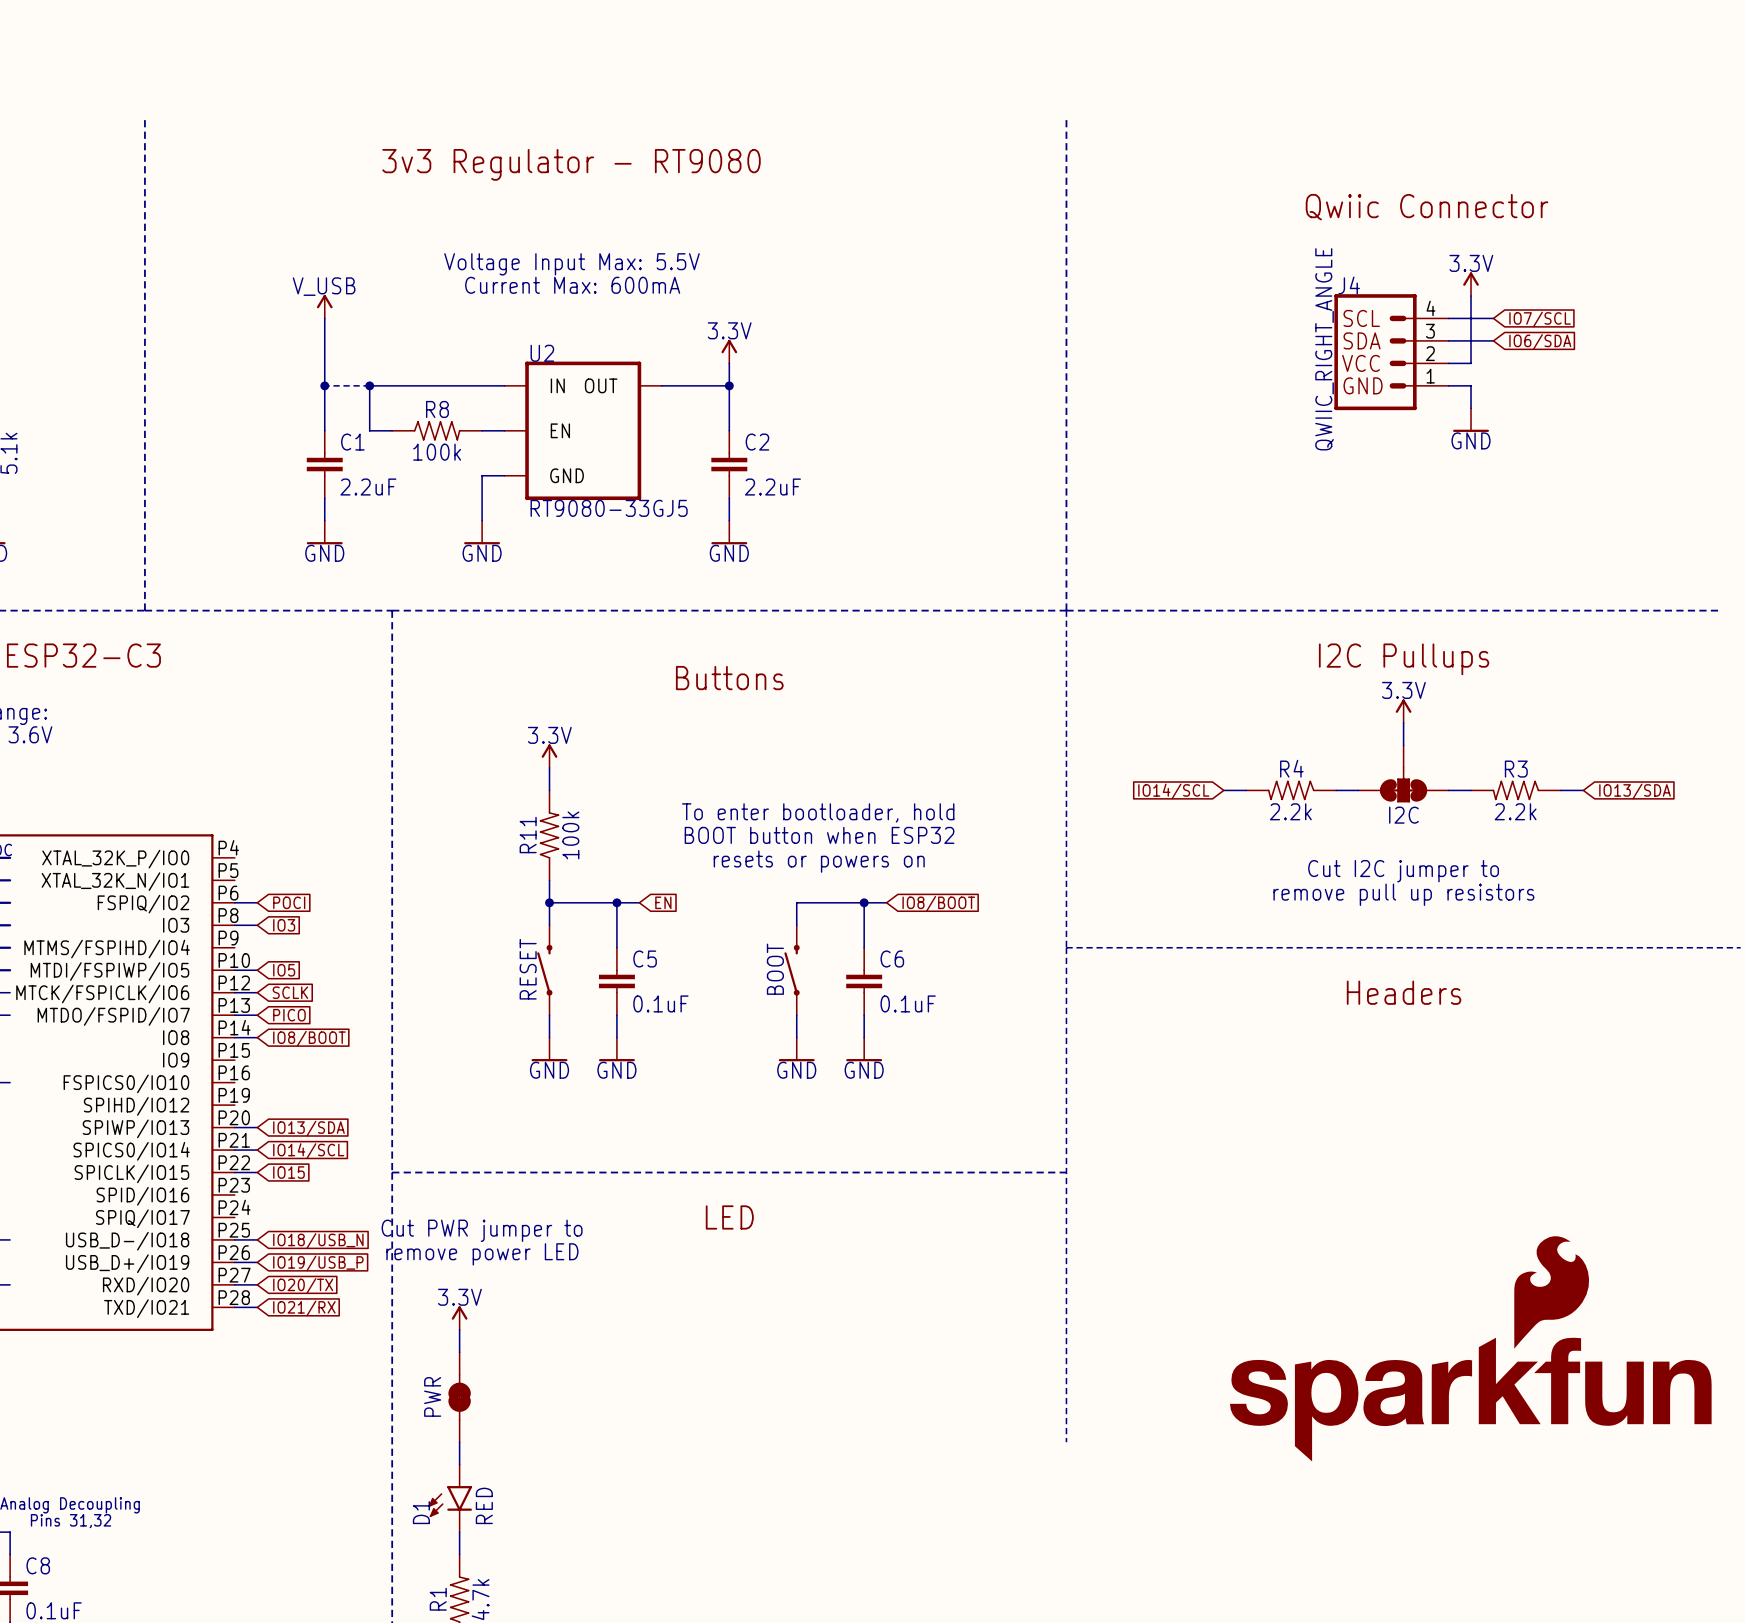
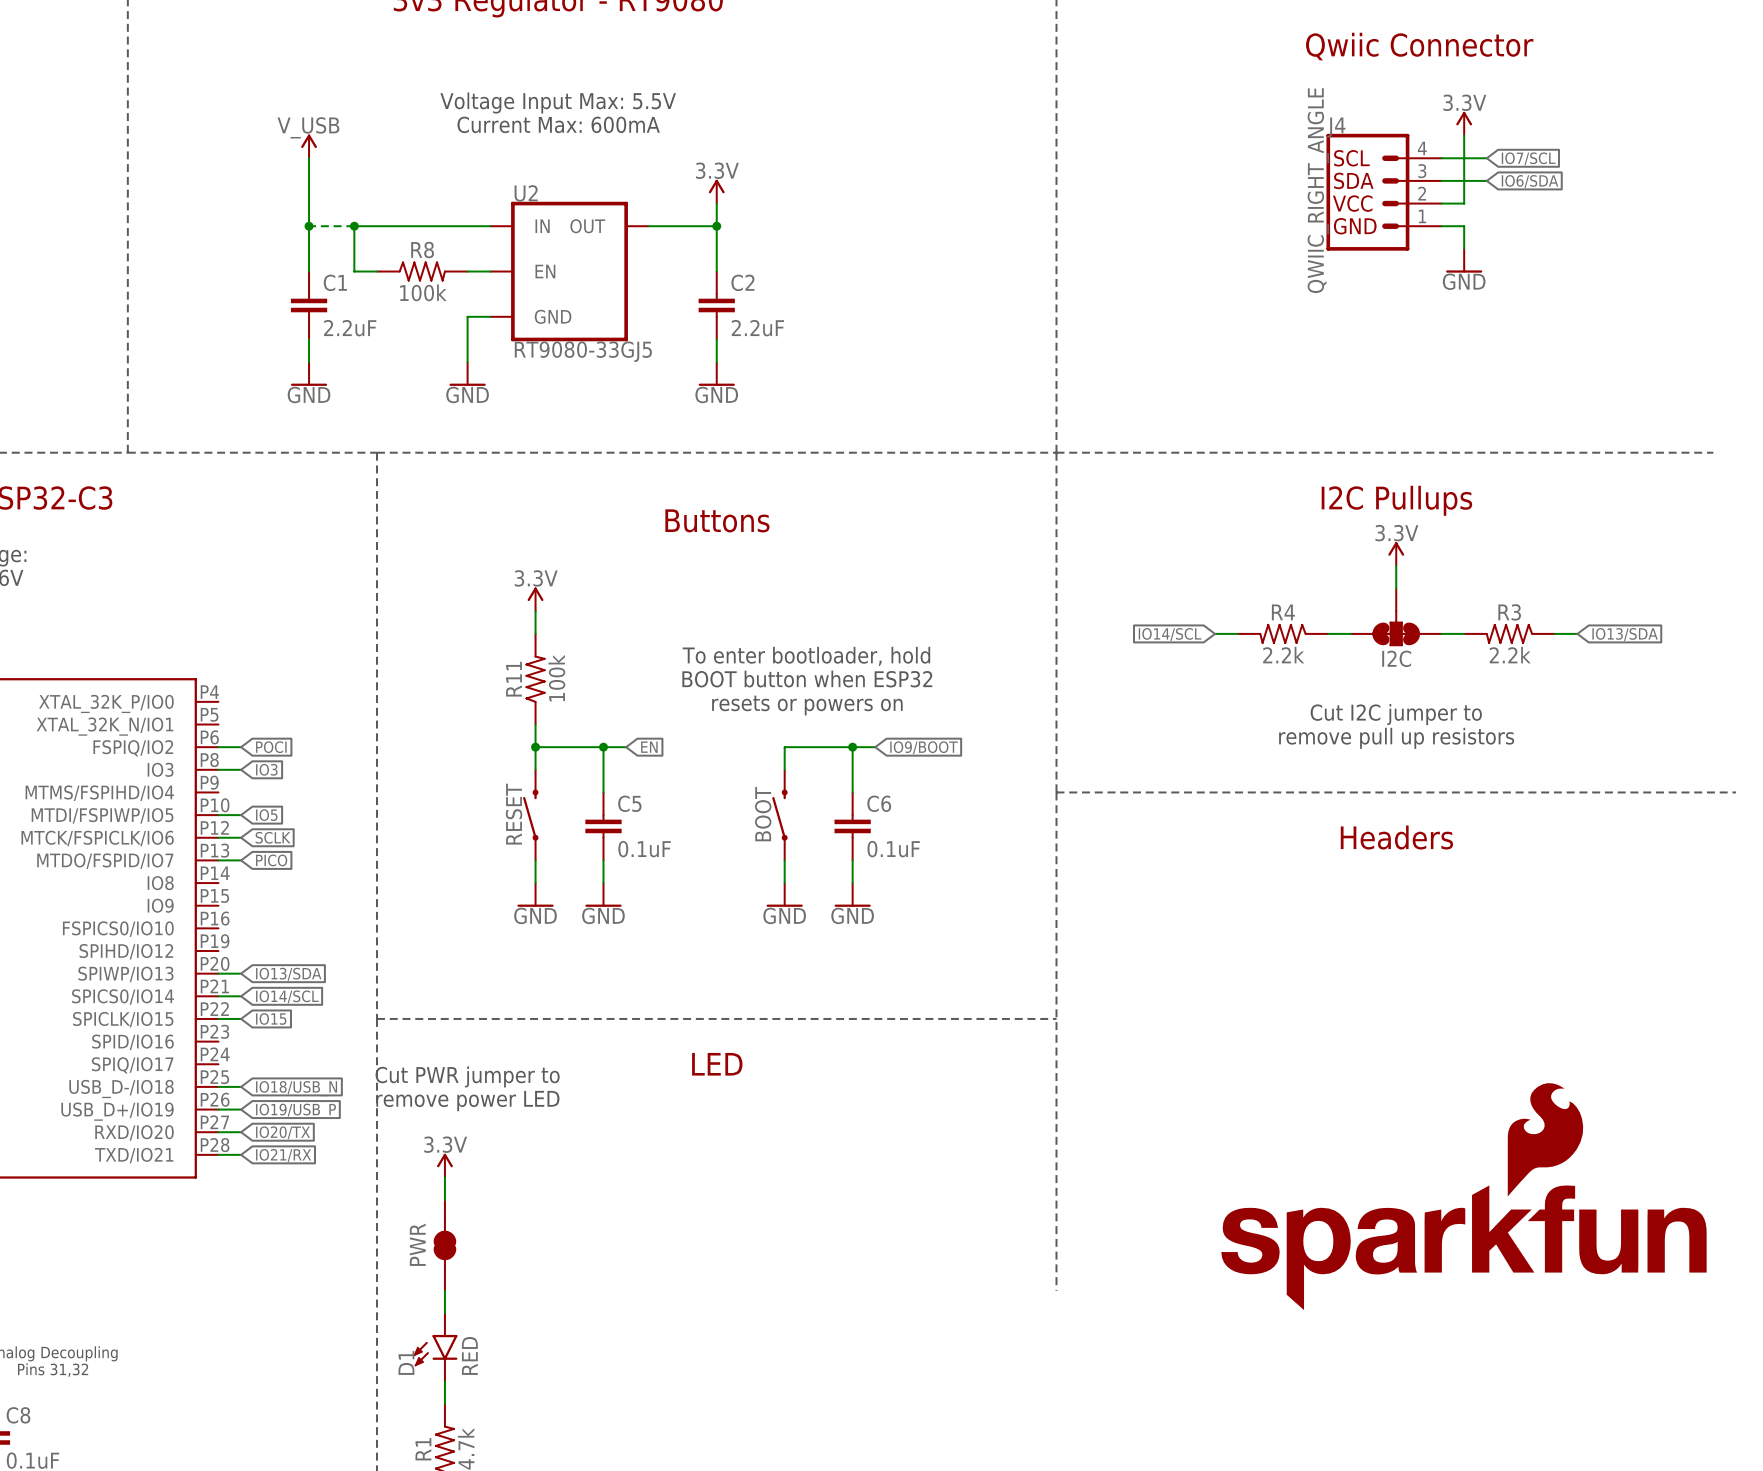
global label: IO8/BOOT (938, 903) -> IO9/BOOT (924, 747)
wire: (234, 1037) (257, 1037) -> none
global label: IO8/BOOT (309, 1038) -> none

